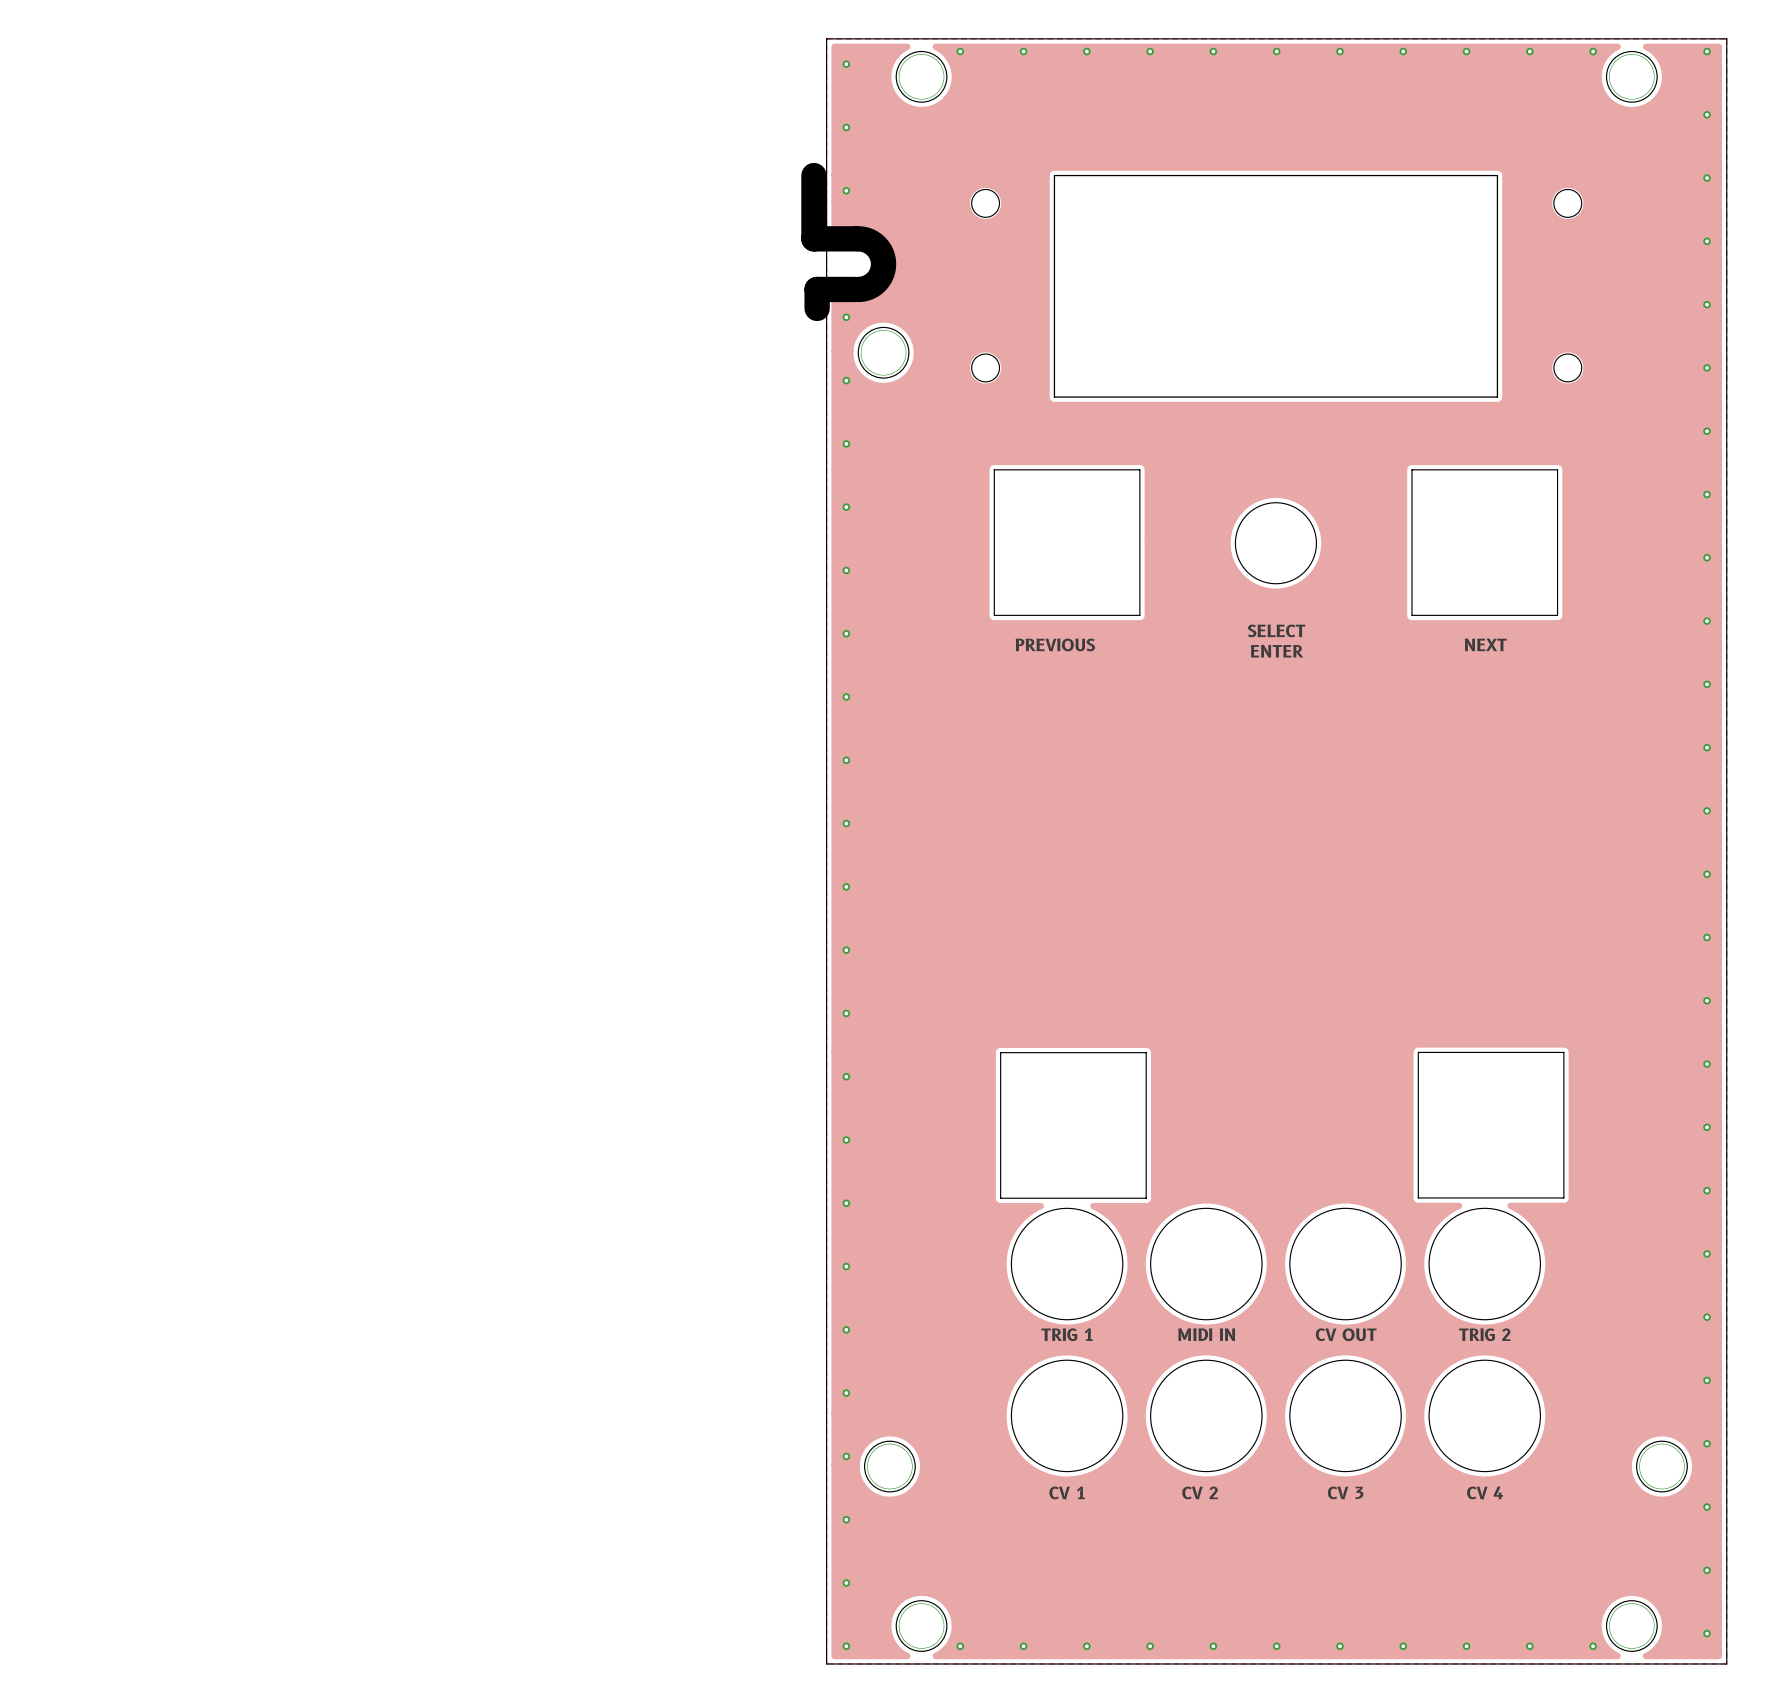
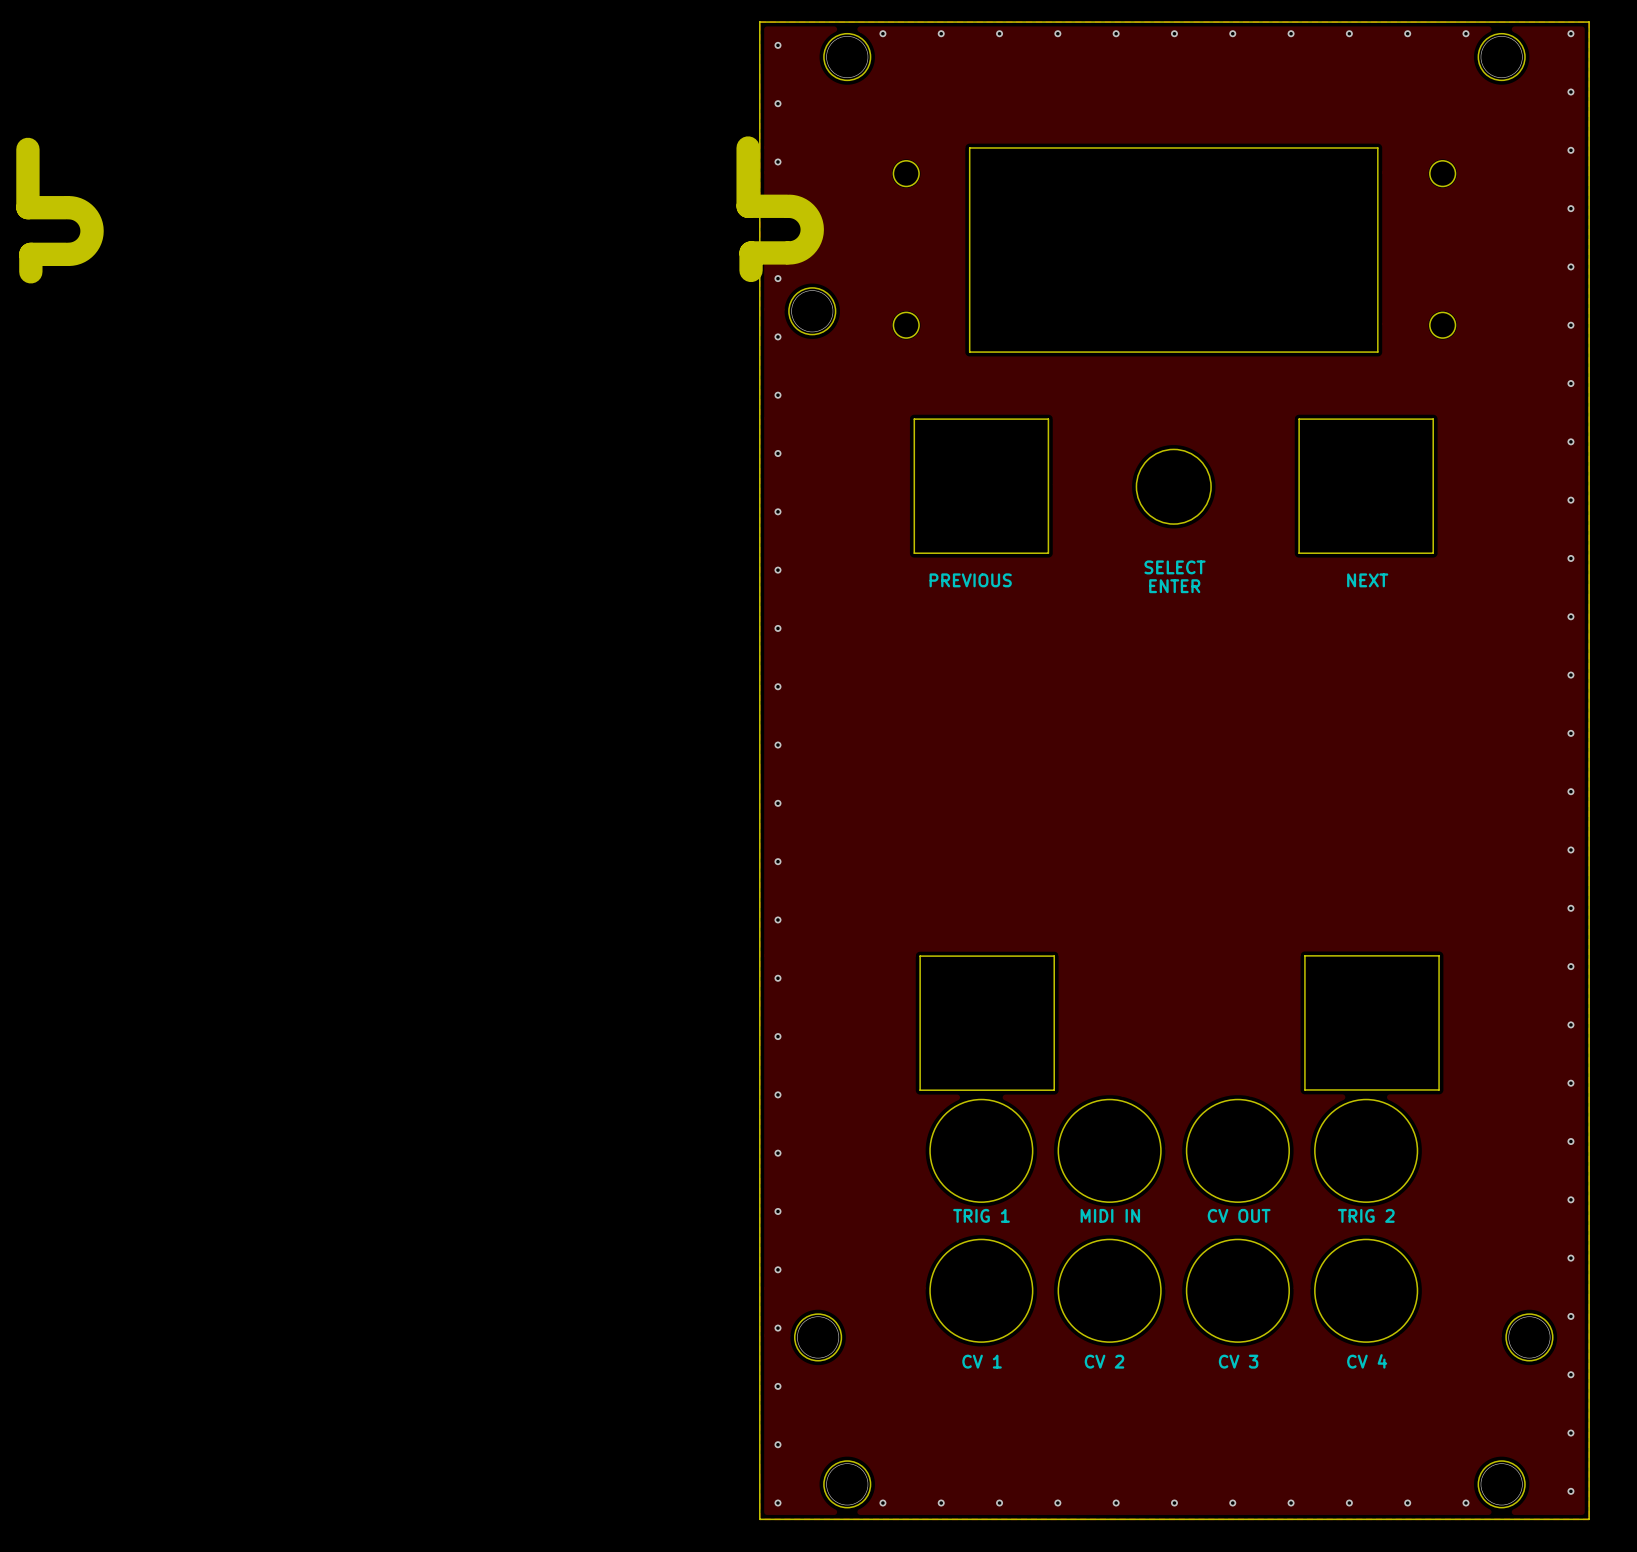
board edge: none -> (27, 149) (27, 207) (65, 207)
board edge: none -> (68, 207) (77, 209) (84, 213) (90, 222) (92, 231) (90, 239) (84, 248) (77, 252) (68, 254)
board edge: none -> (65, 254) (30, 254) (30, 271)

